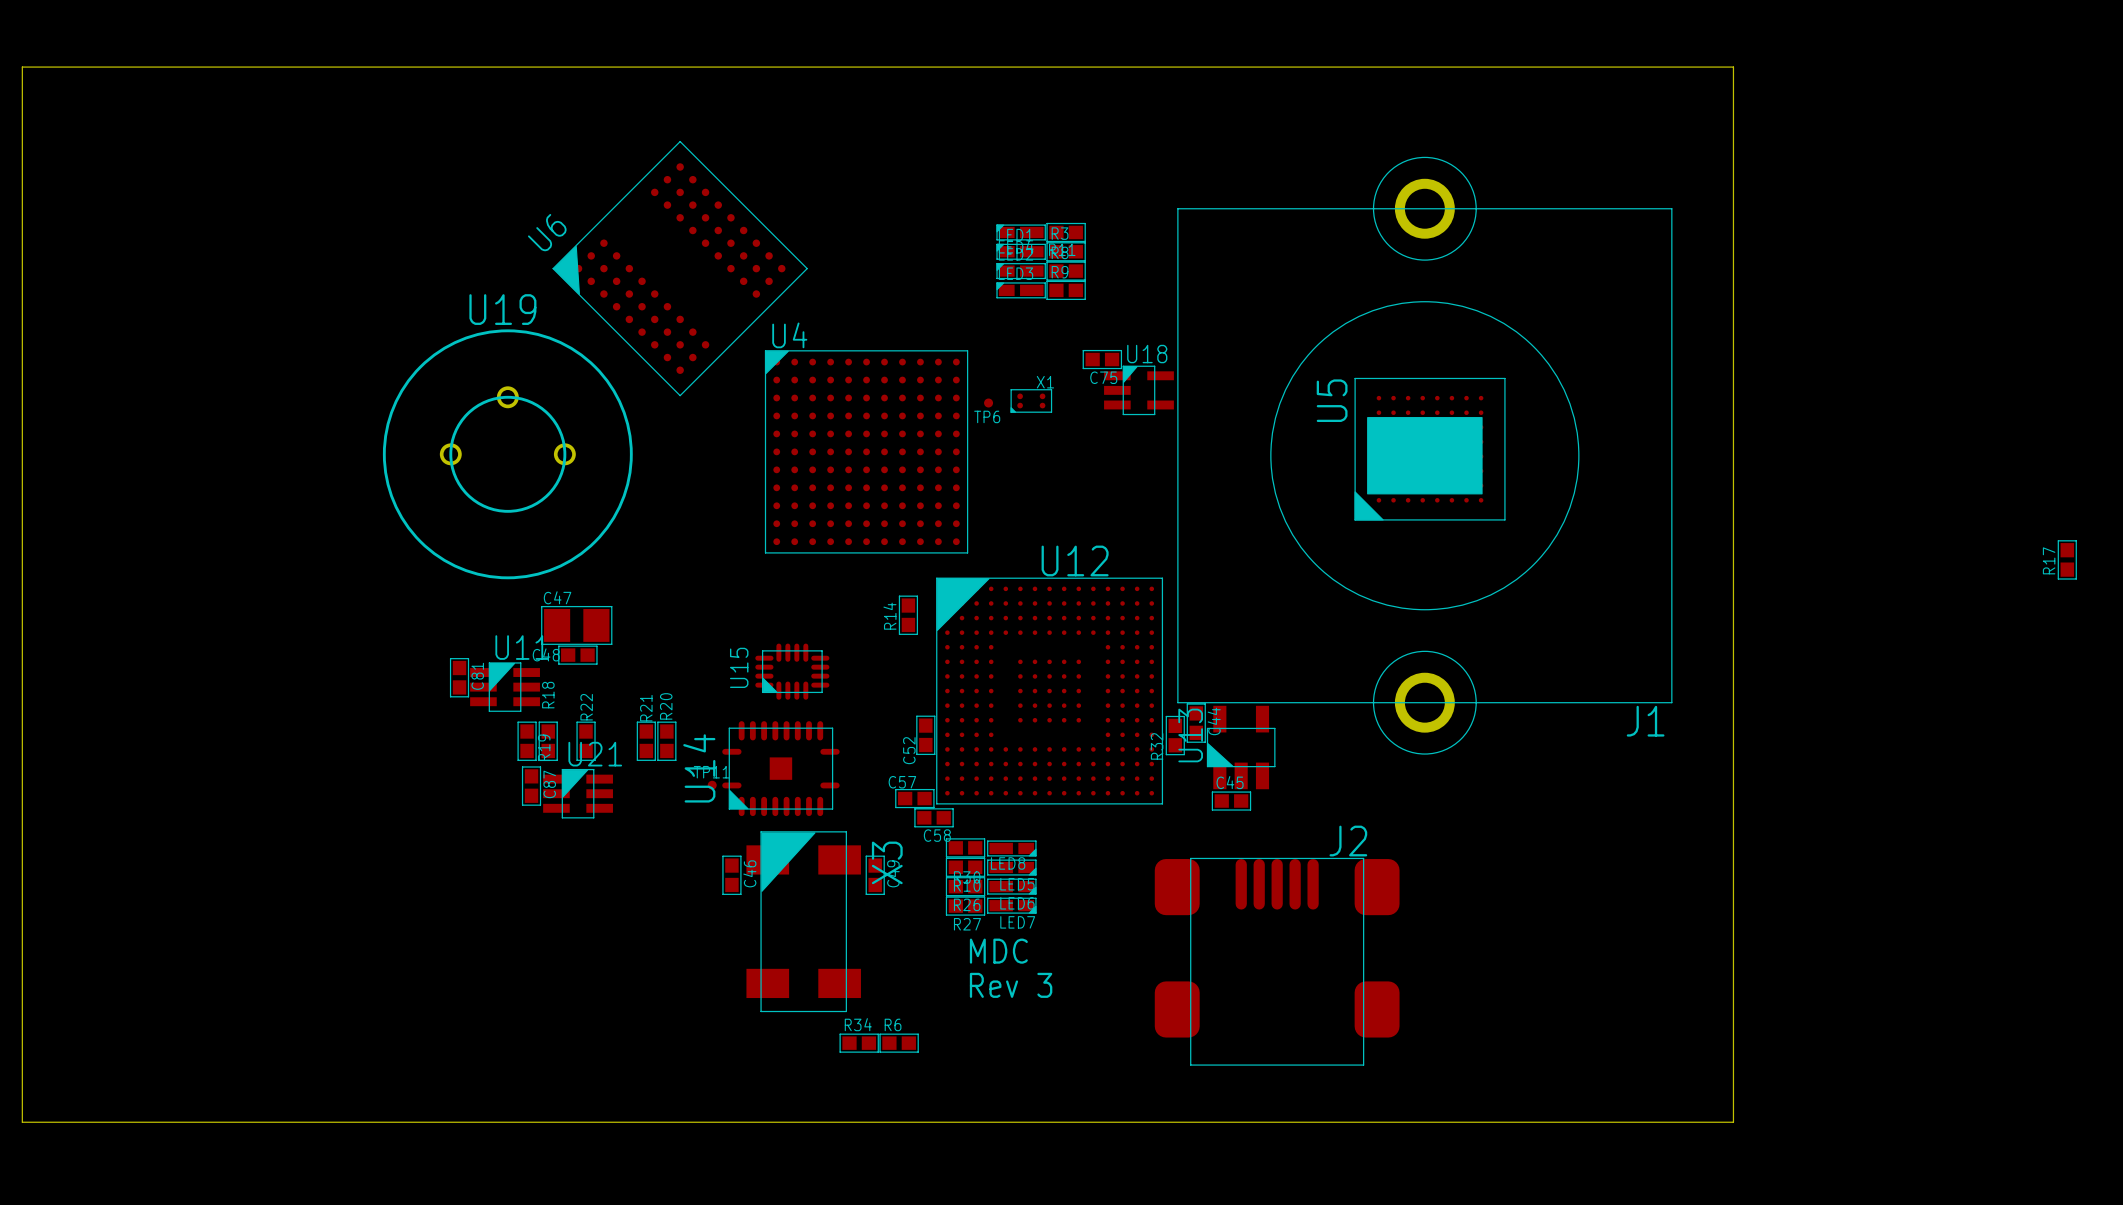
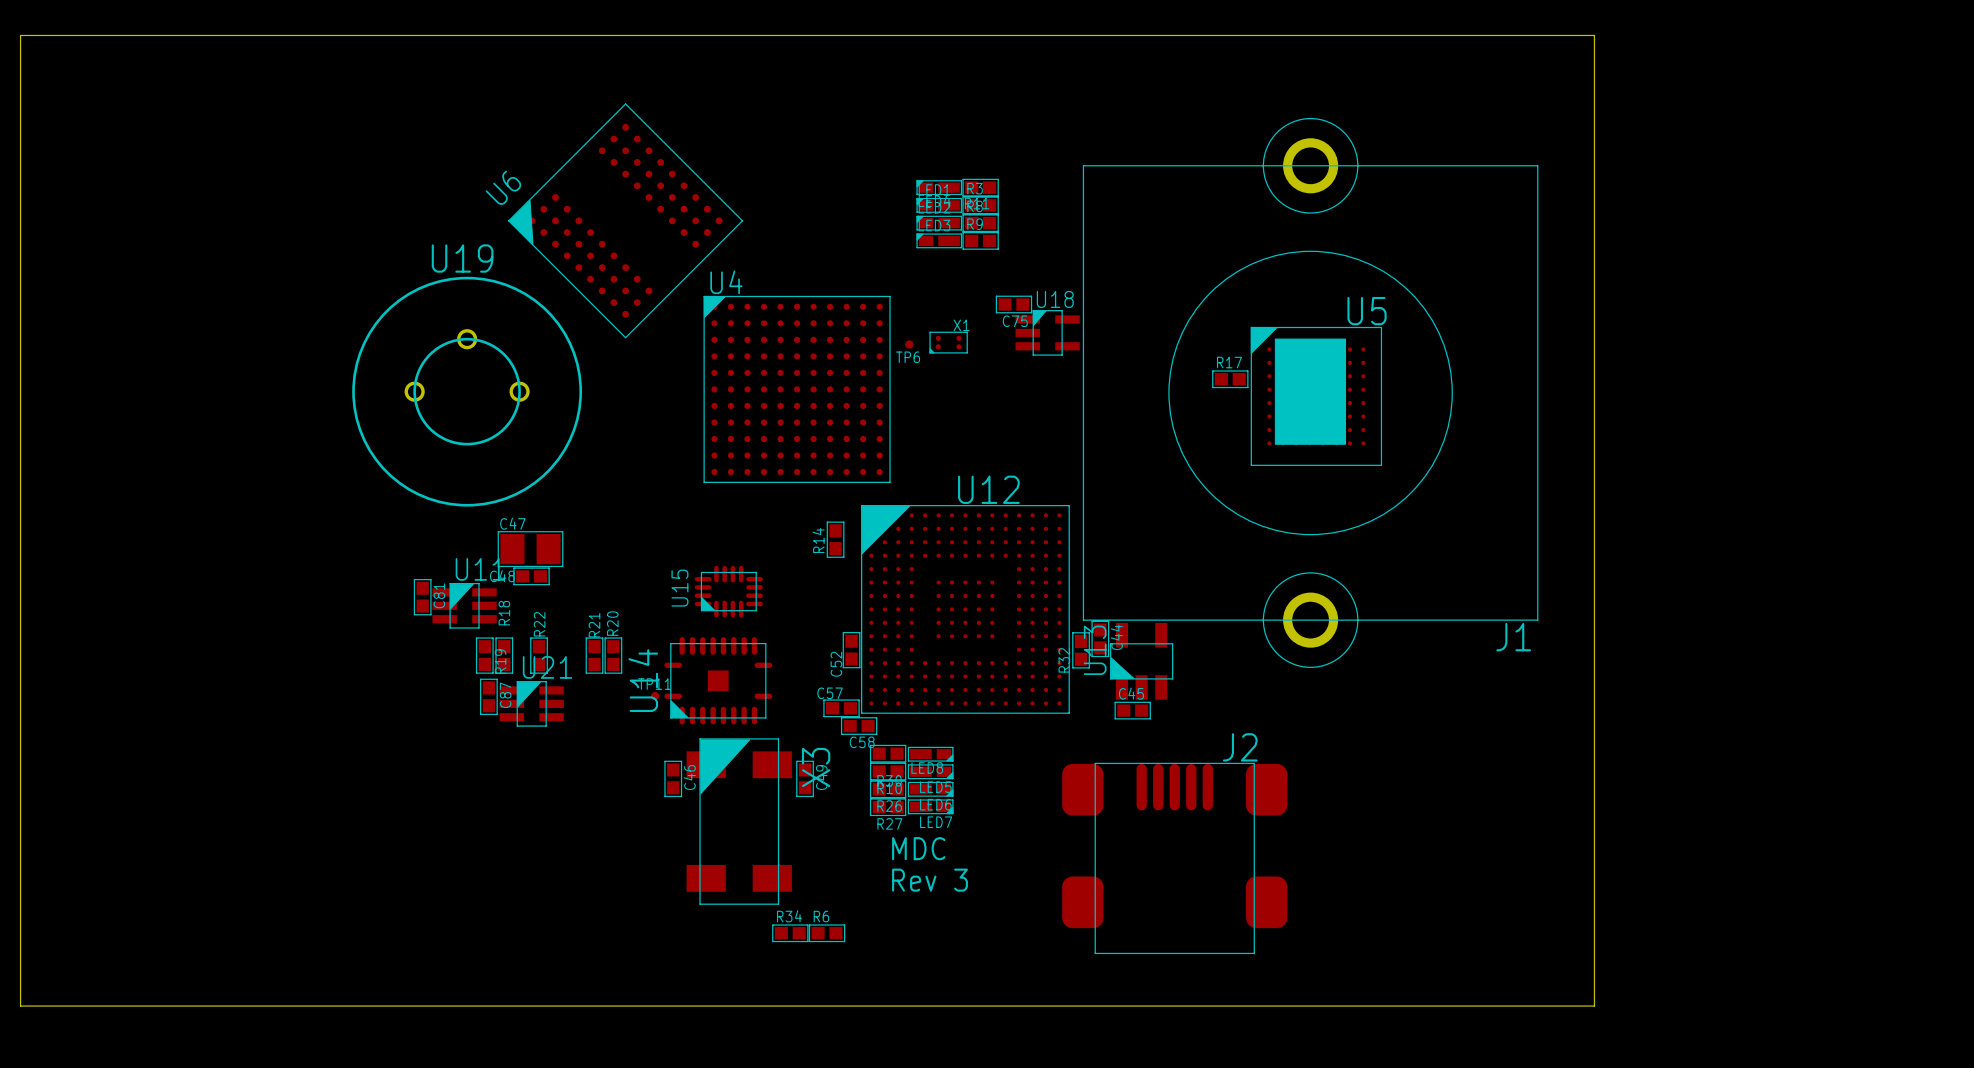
U5 rotation: 0° (1430, 449) -> 90° clockwise (1316, 396)
R17 rotation: 0° (2067, 559) -> 90° clockwise (1230, 379)
R17 position: (2067, 559) -> (1230, 379)

